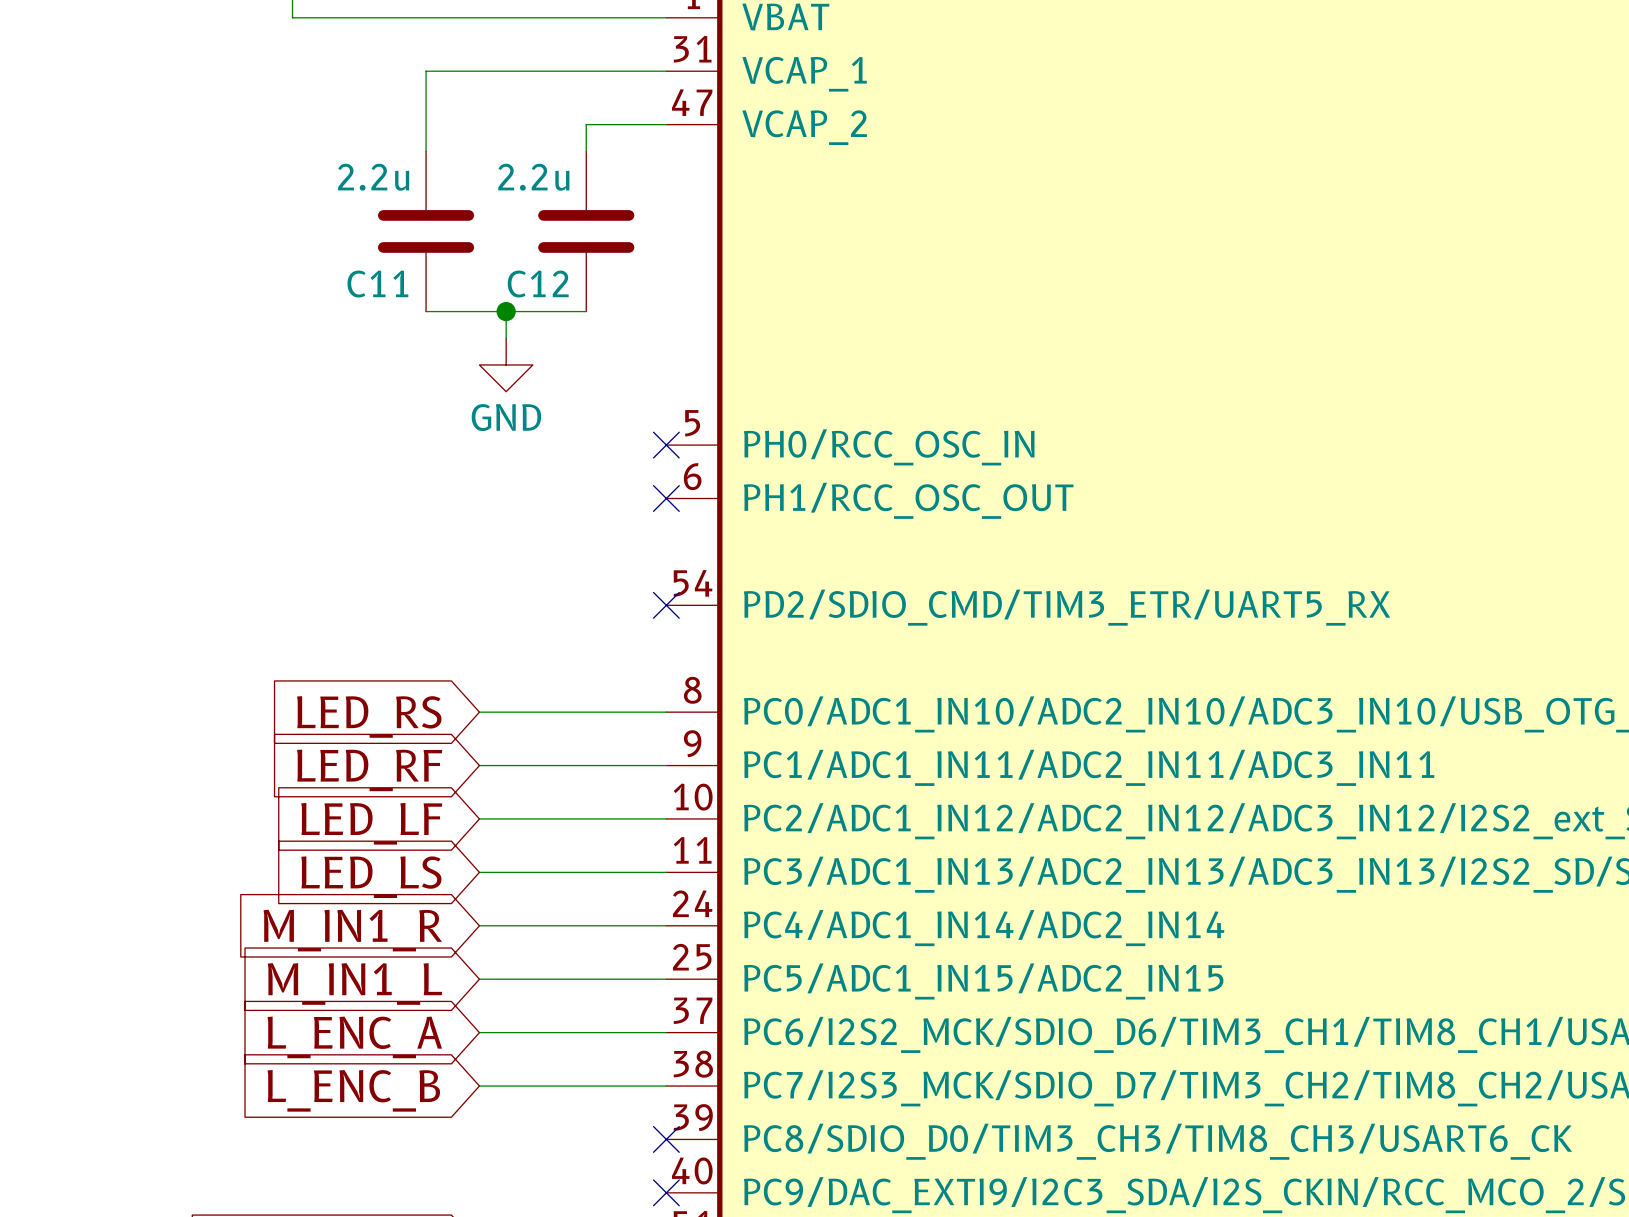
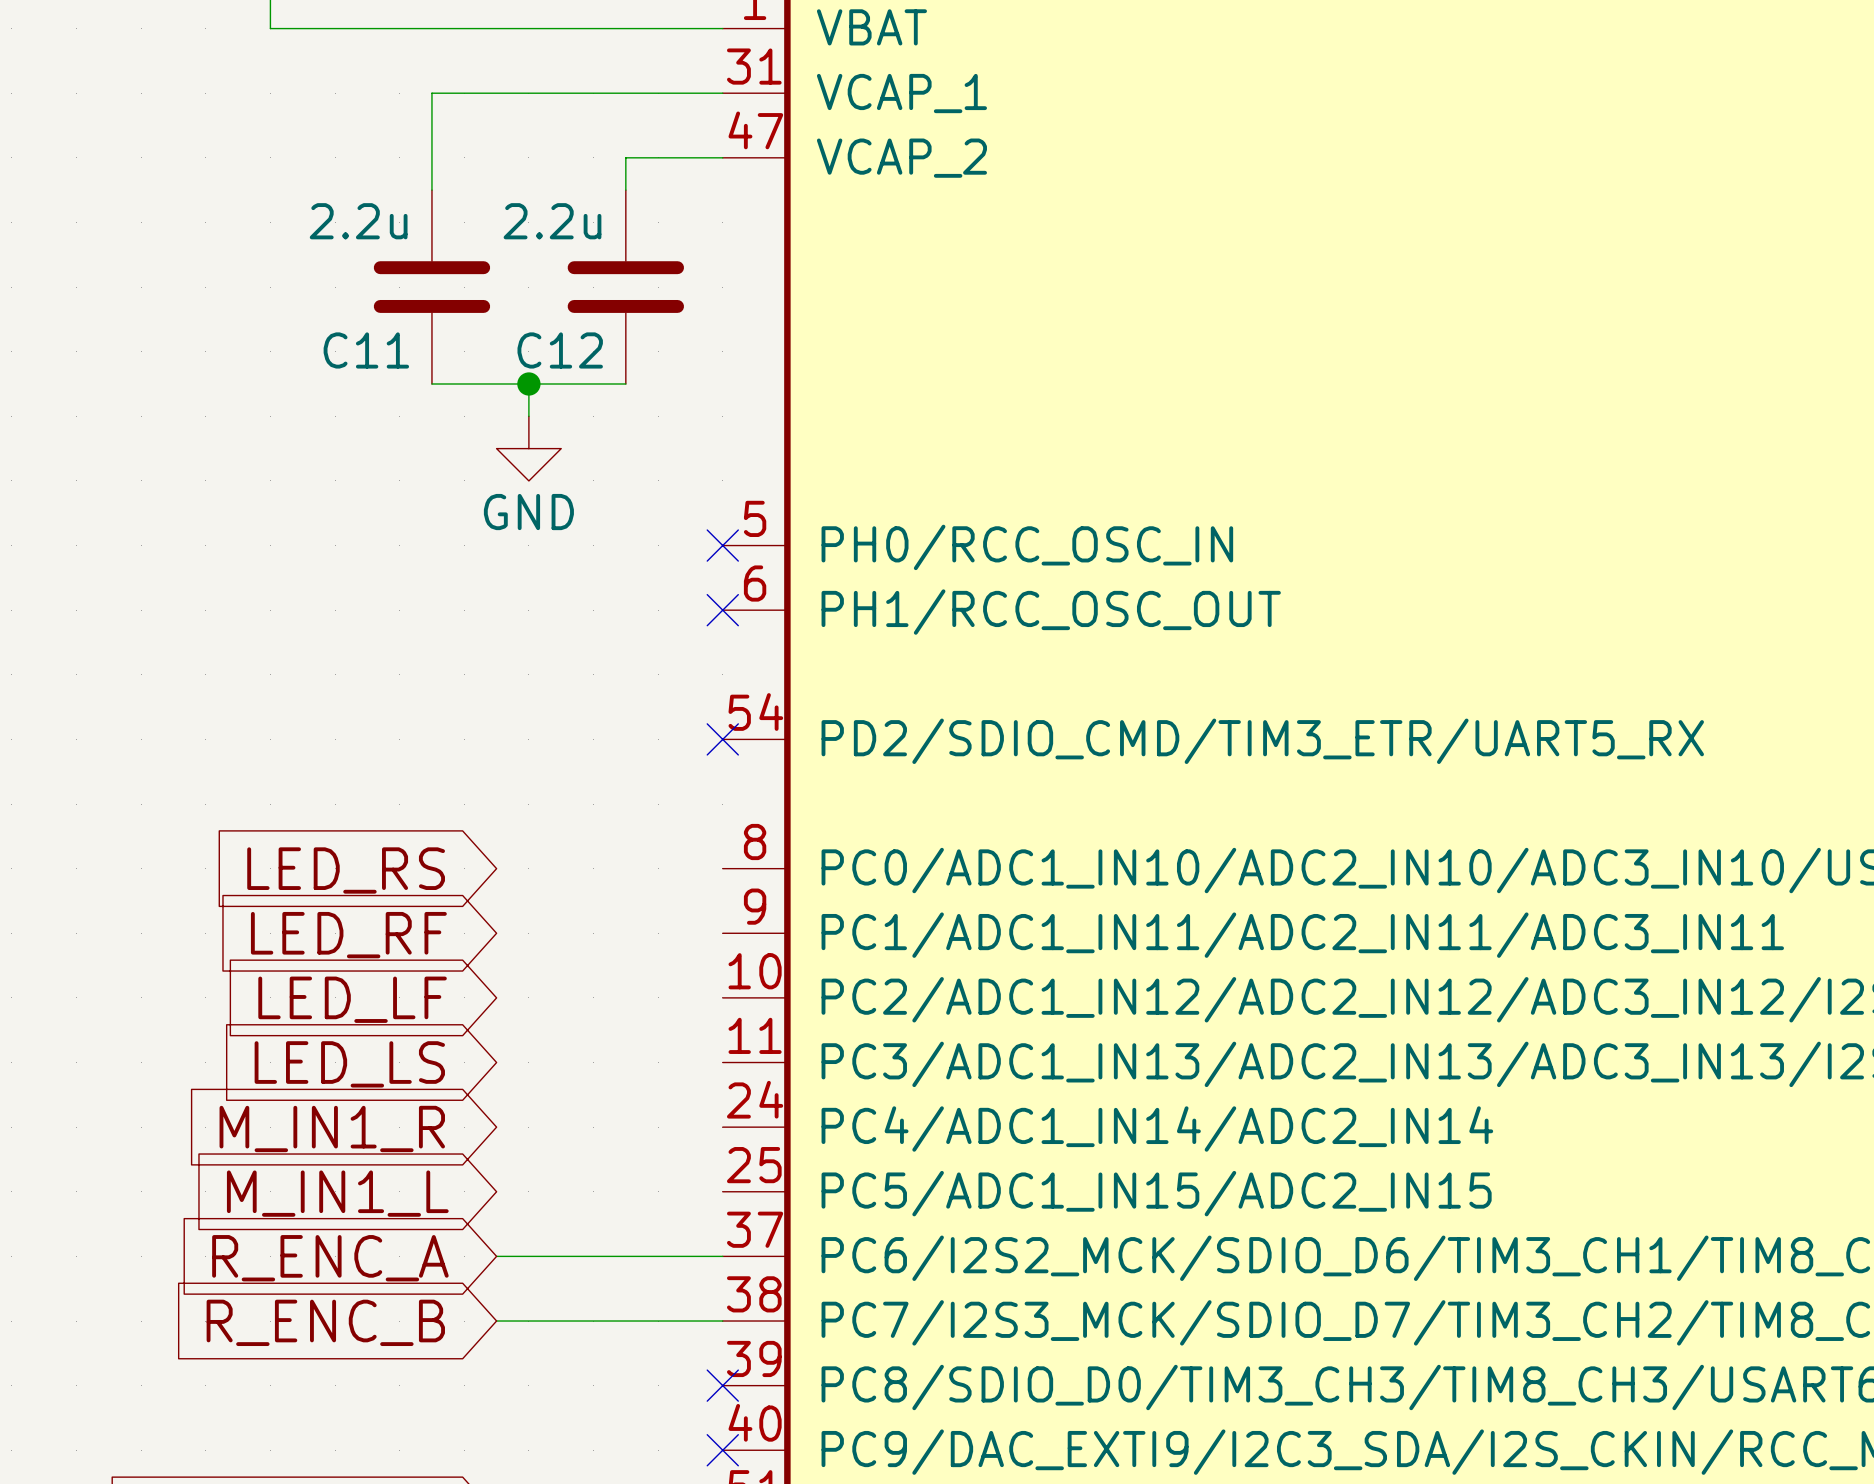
wire: (479, 712) (666, 712) -> none
wire: (479, 765) (666, 765) -> none
wire: (479, 818) (666, 818) -> none
wire: (479, 872) (666, 872) -> none
wire: (479, 925) (666, 925) -> none
wire: (479, 979) (666, 979) -> none
global label: L_ENC_A (354, 1037) -> R_ENC_A (330, 1258)
global label: L_ENC_B (353, 1090) -> R_ENC_B (325, 1322)

